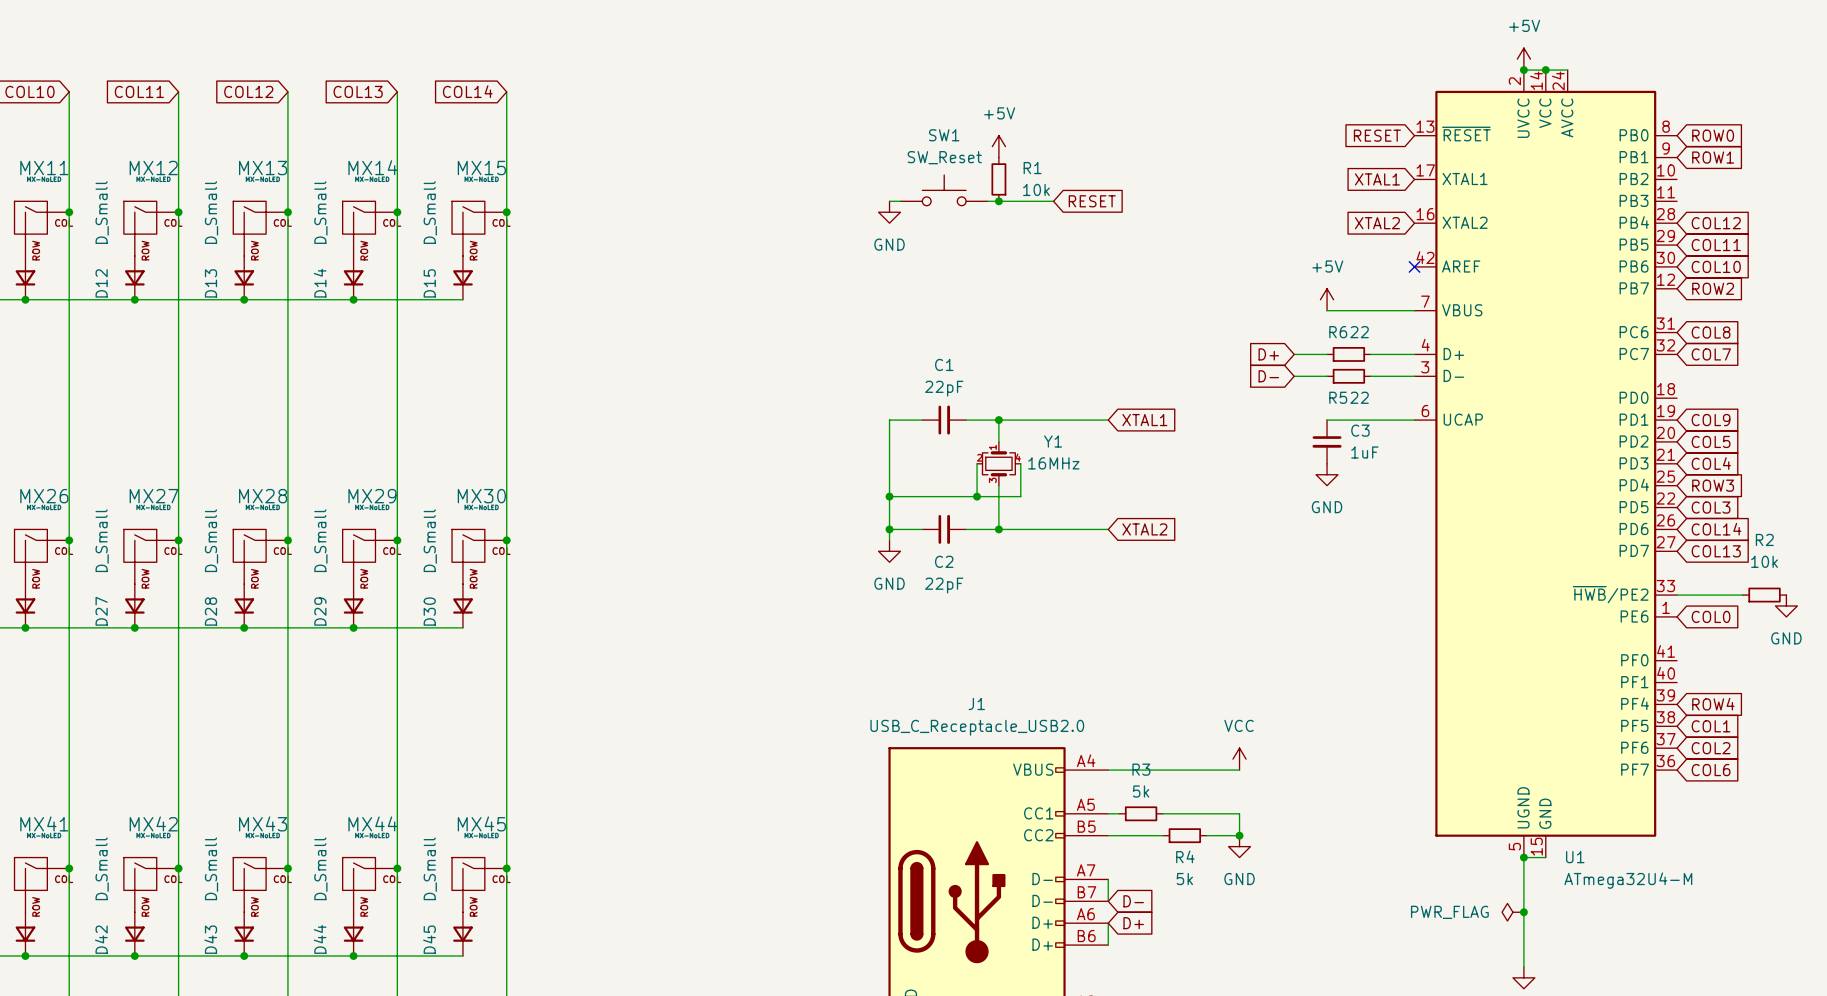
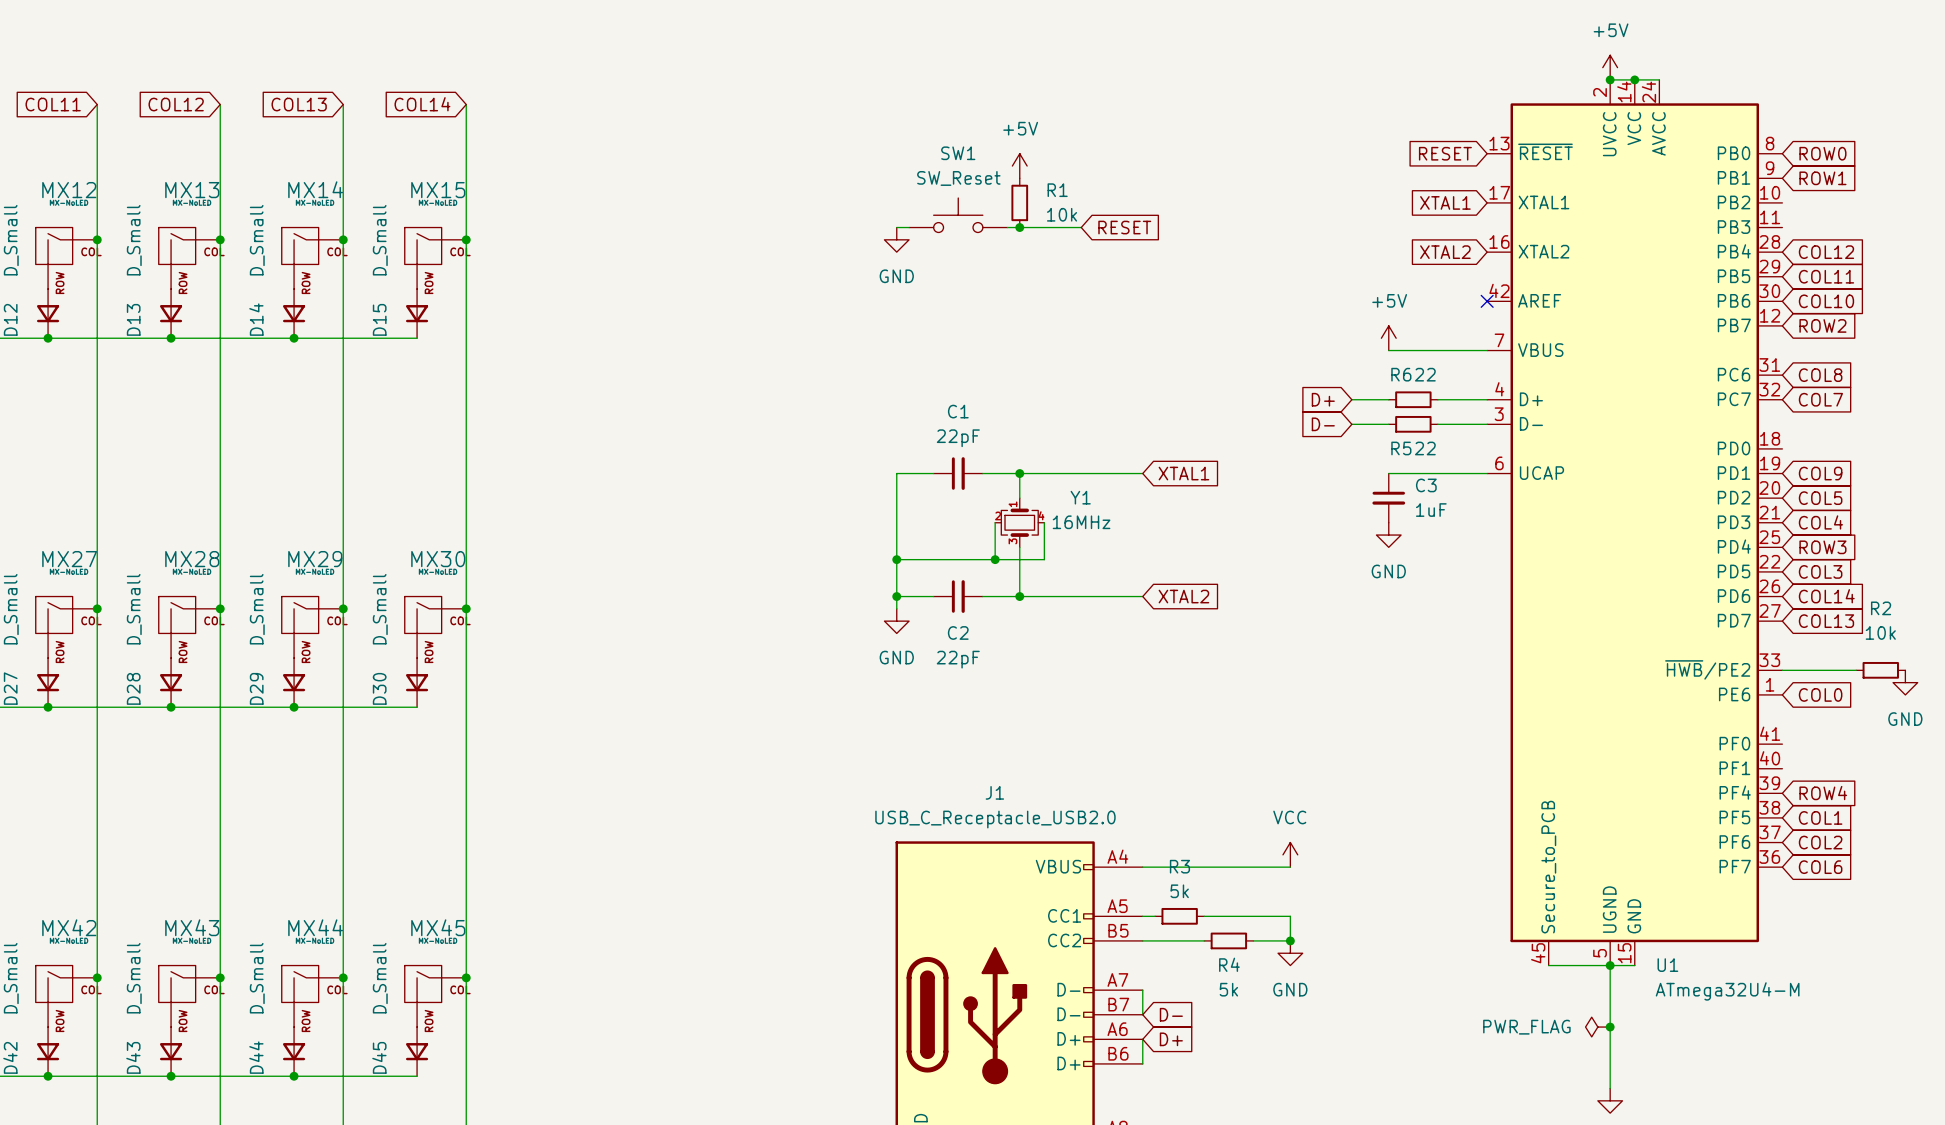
U1 symbol: [1414, 70, 1678, 858] -> [1487, 79, 1783, 966]
wire: none -> (1548, 965) (1610, 965)

